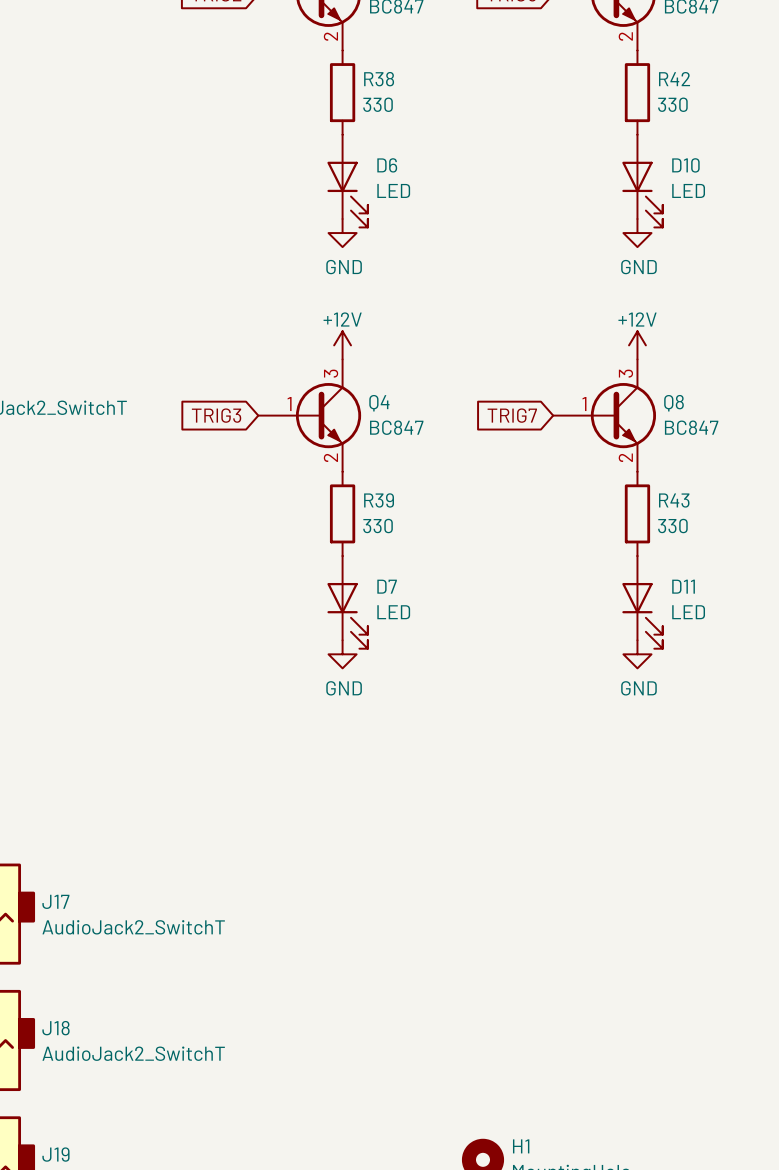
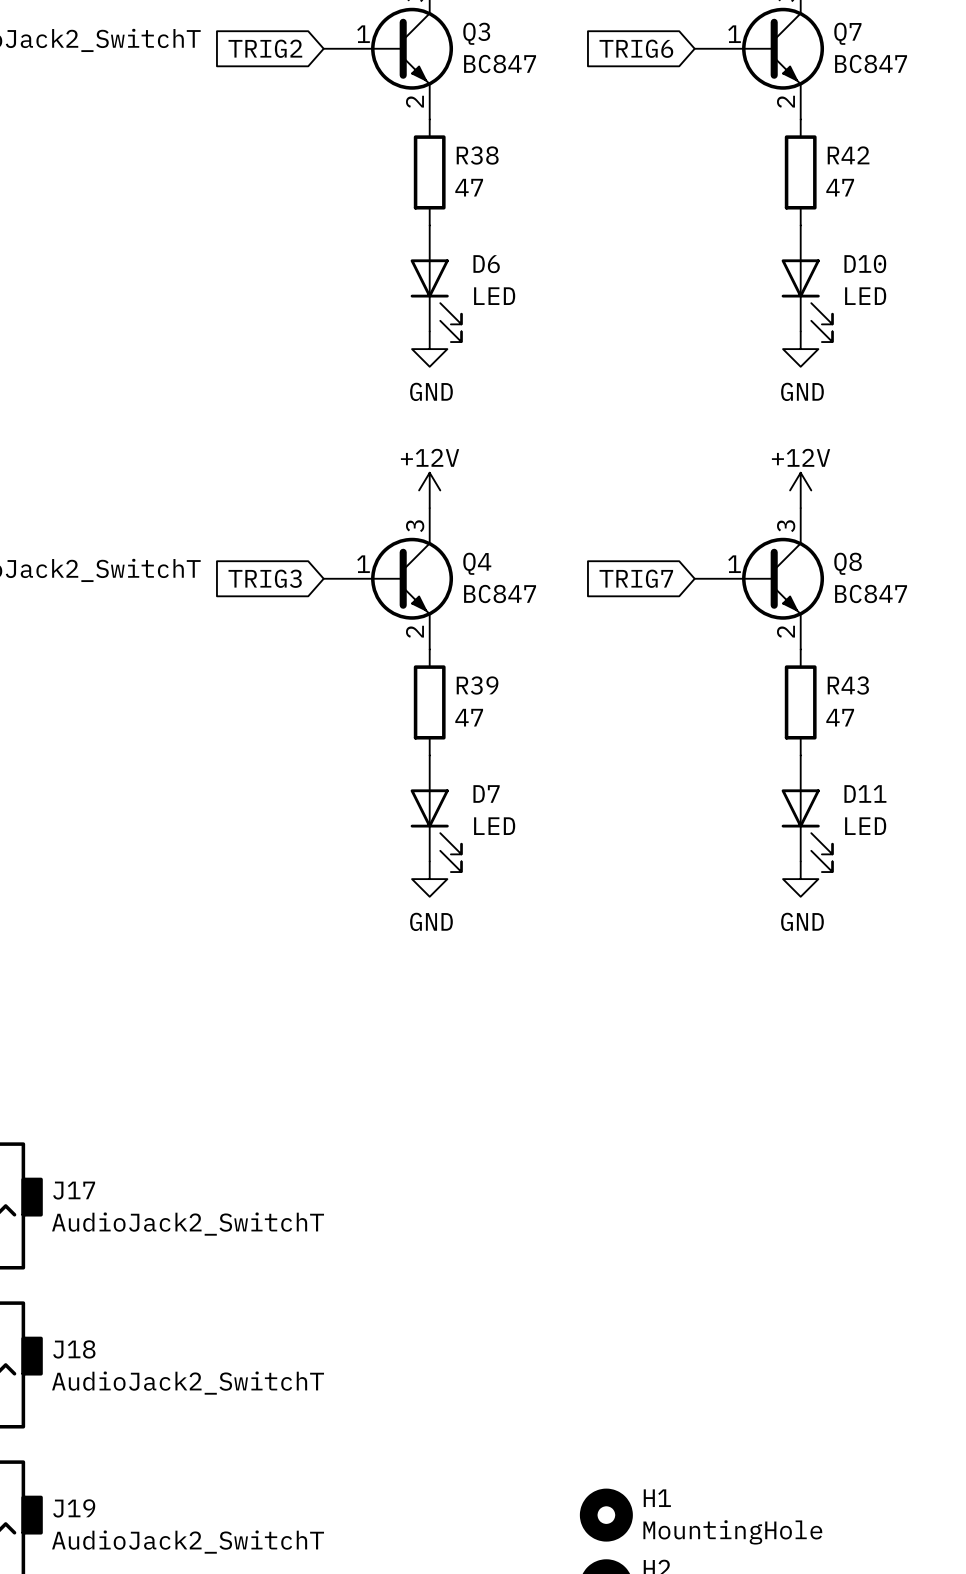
R38 value: 330 (378, 104) -> 47 (469, 187)
R42 value: 330 (672, 104) -> 47 (840, 187)
R39 value: 330 (378, 526) -> 47 (469, 717)
R43 value: 330 (672, 526) -> 47 (840, 717)

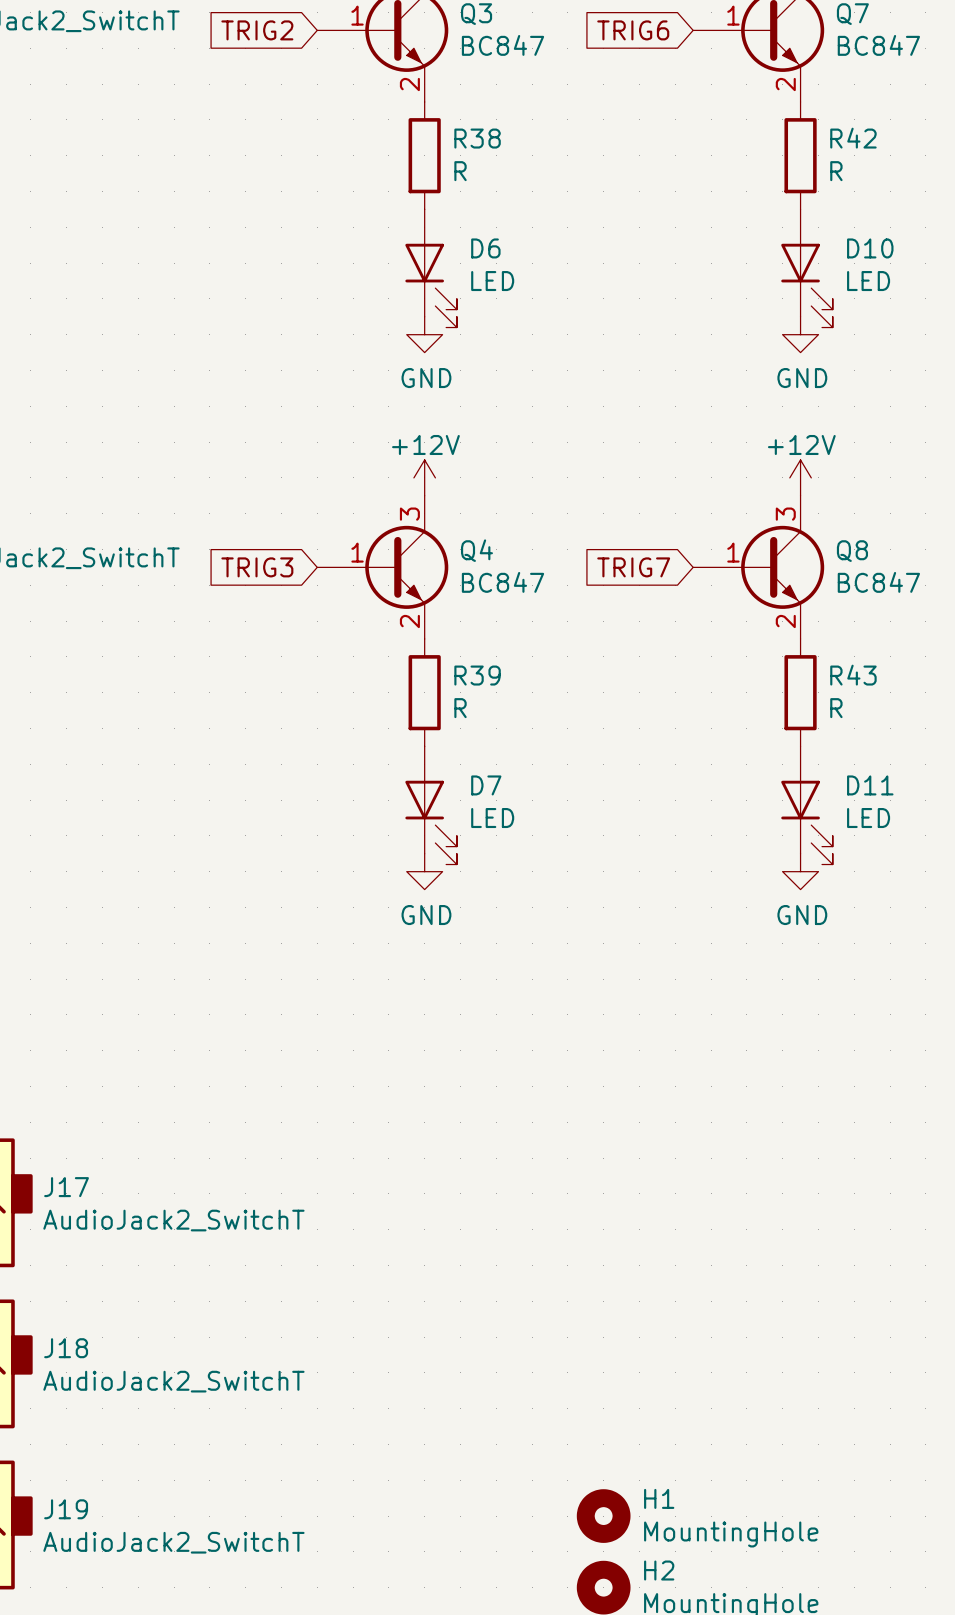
R38 value: 47 (469, 187) -> R (460, 171)
R42 value: 47 (840, 187) -> R (836, 171)
R39 value: 47 (469, 717) -> R (460, 708)
R43 value: 47 (840, 717) -> R (836, 708)

